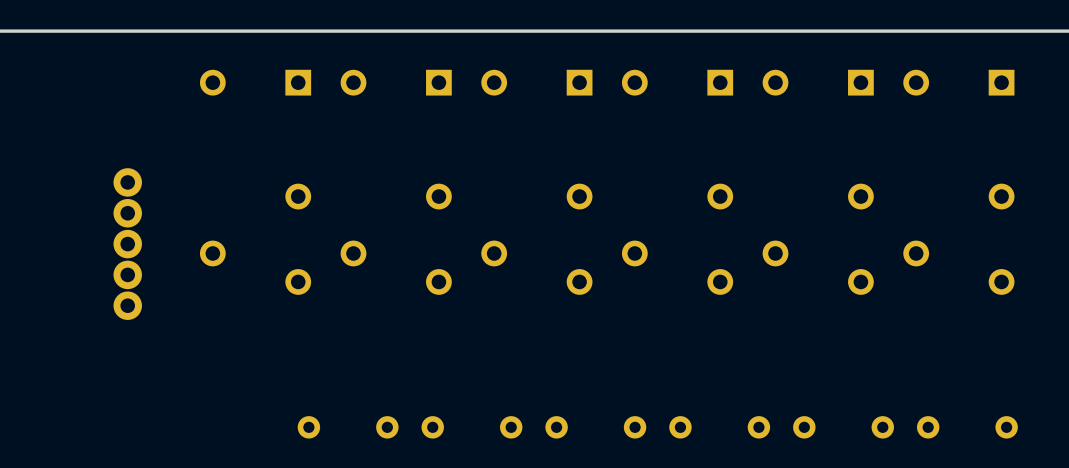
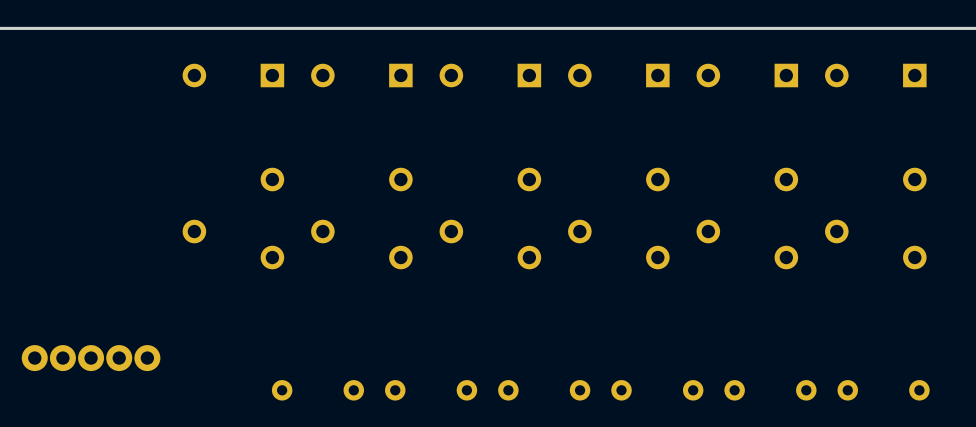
part rotation: 0° (127, 244) -> 90° clockwise (91, 358)
part position: (127, 244) -> (91, 358)

